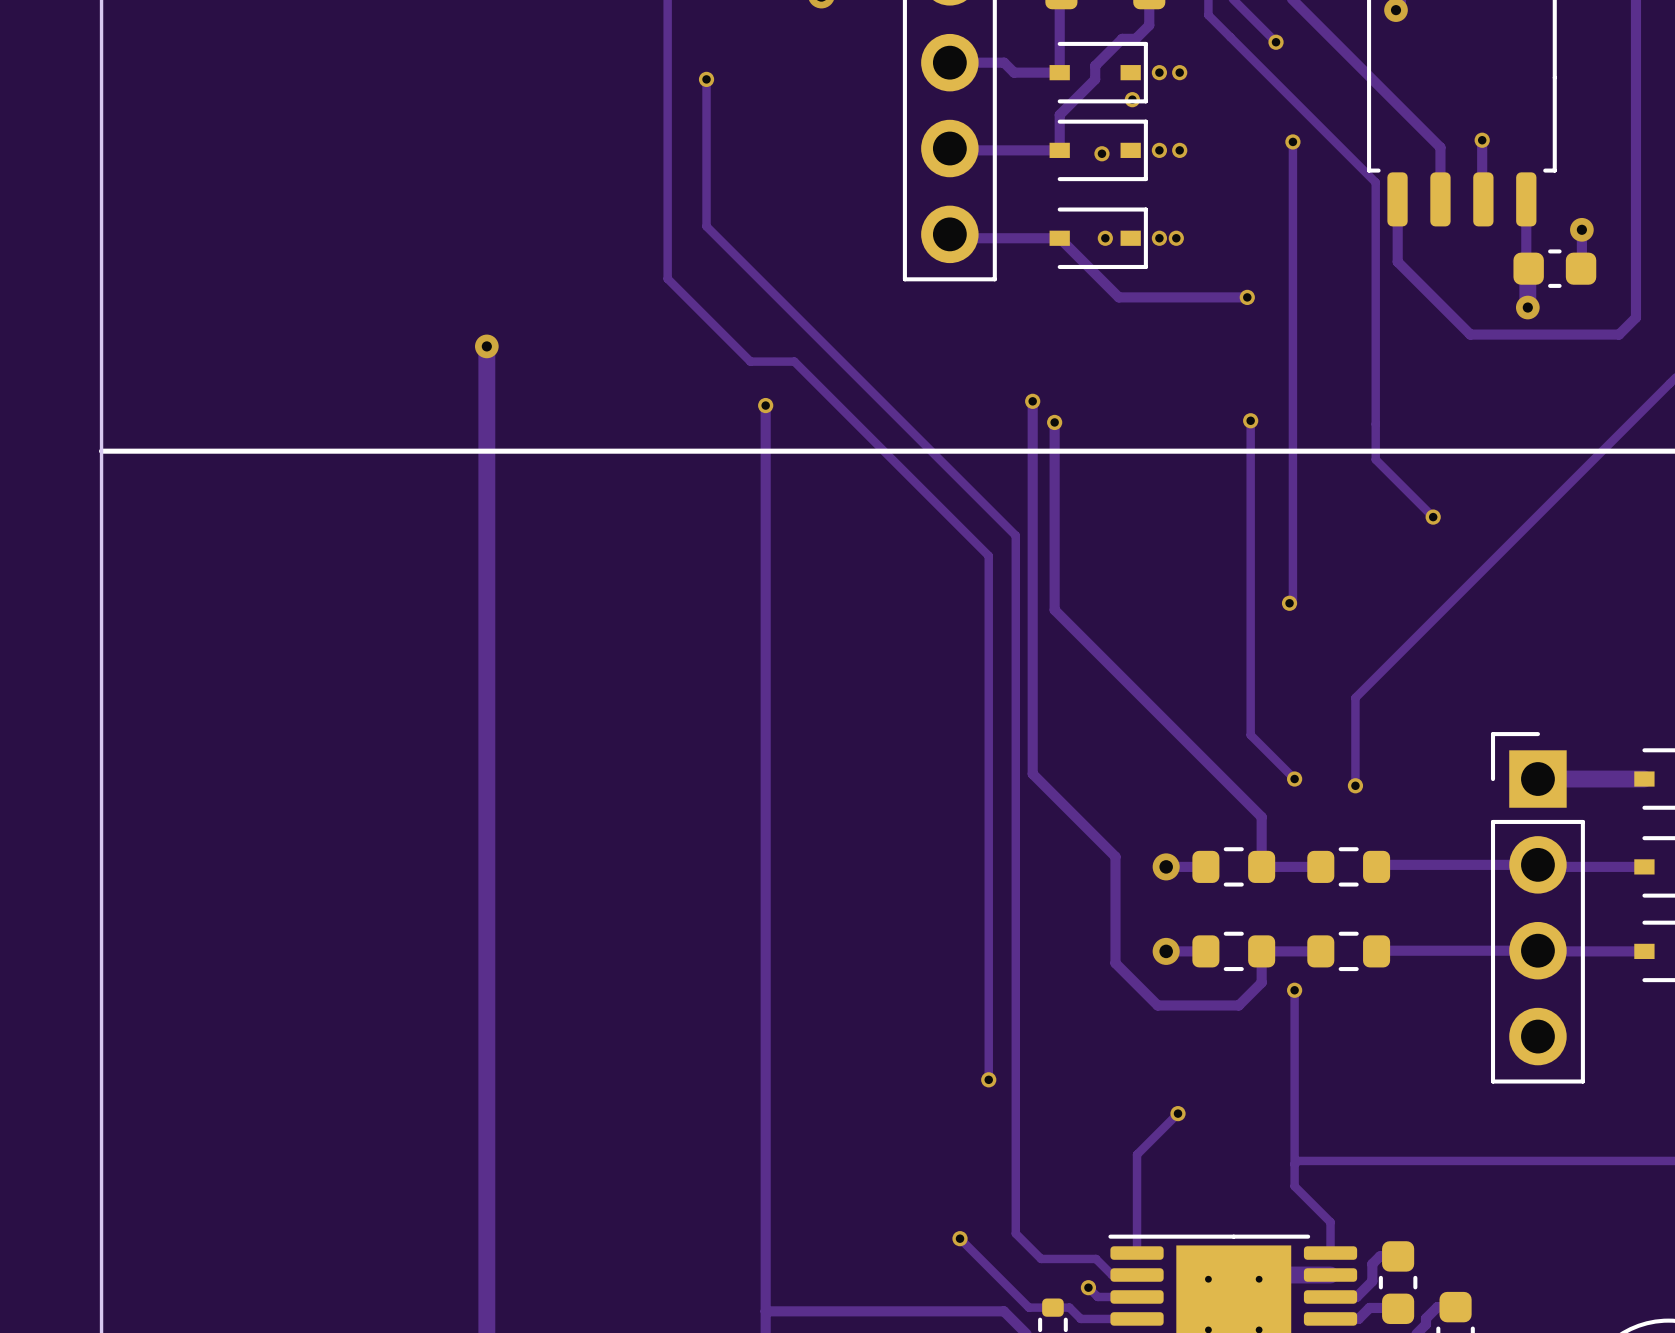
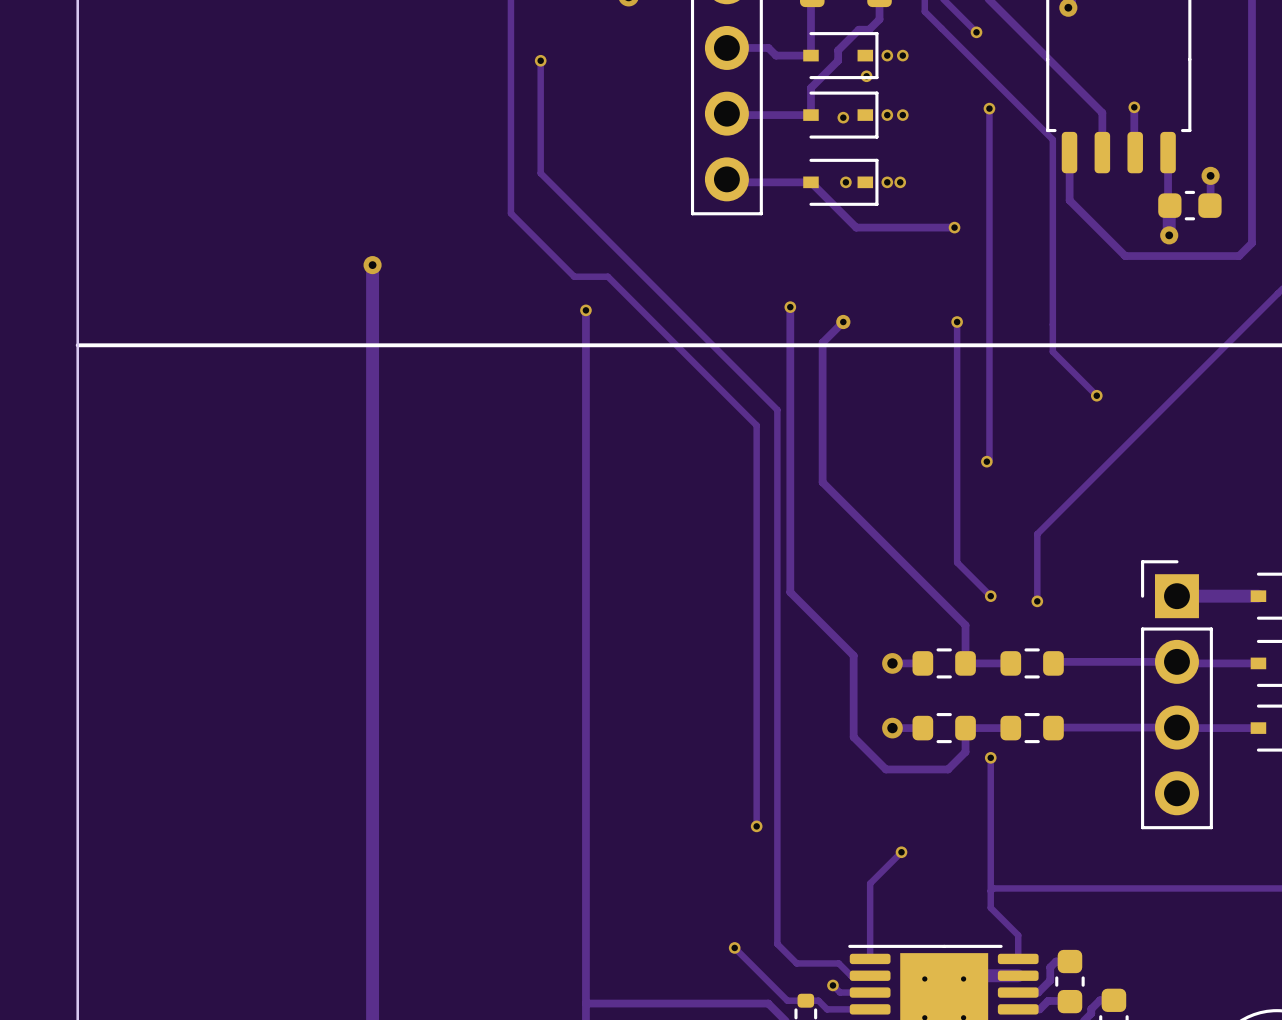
via: none -> (843, 322)
track: (1054, 422) (1054, 610) (1074, 630) -> (843, 322) (822, 342) (822, 482)
via: (1054, 422) -> none

